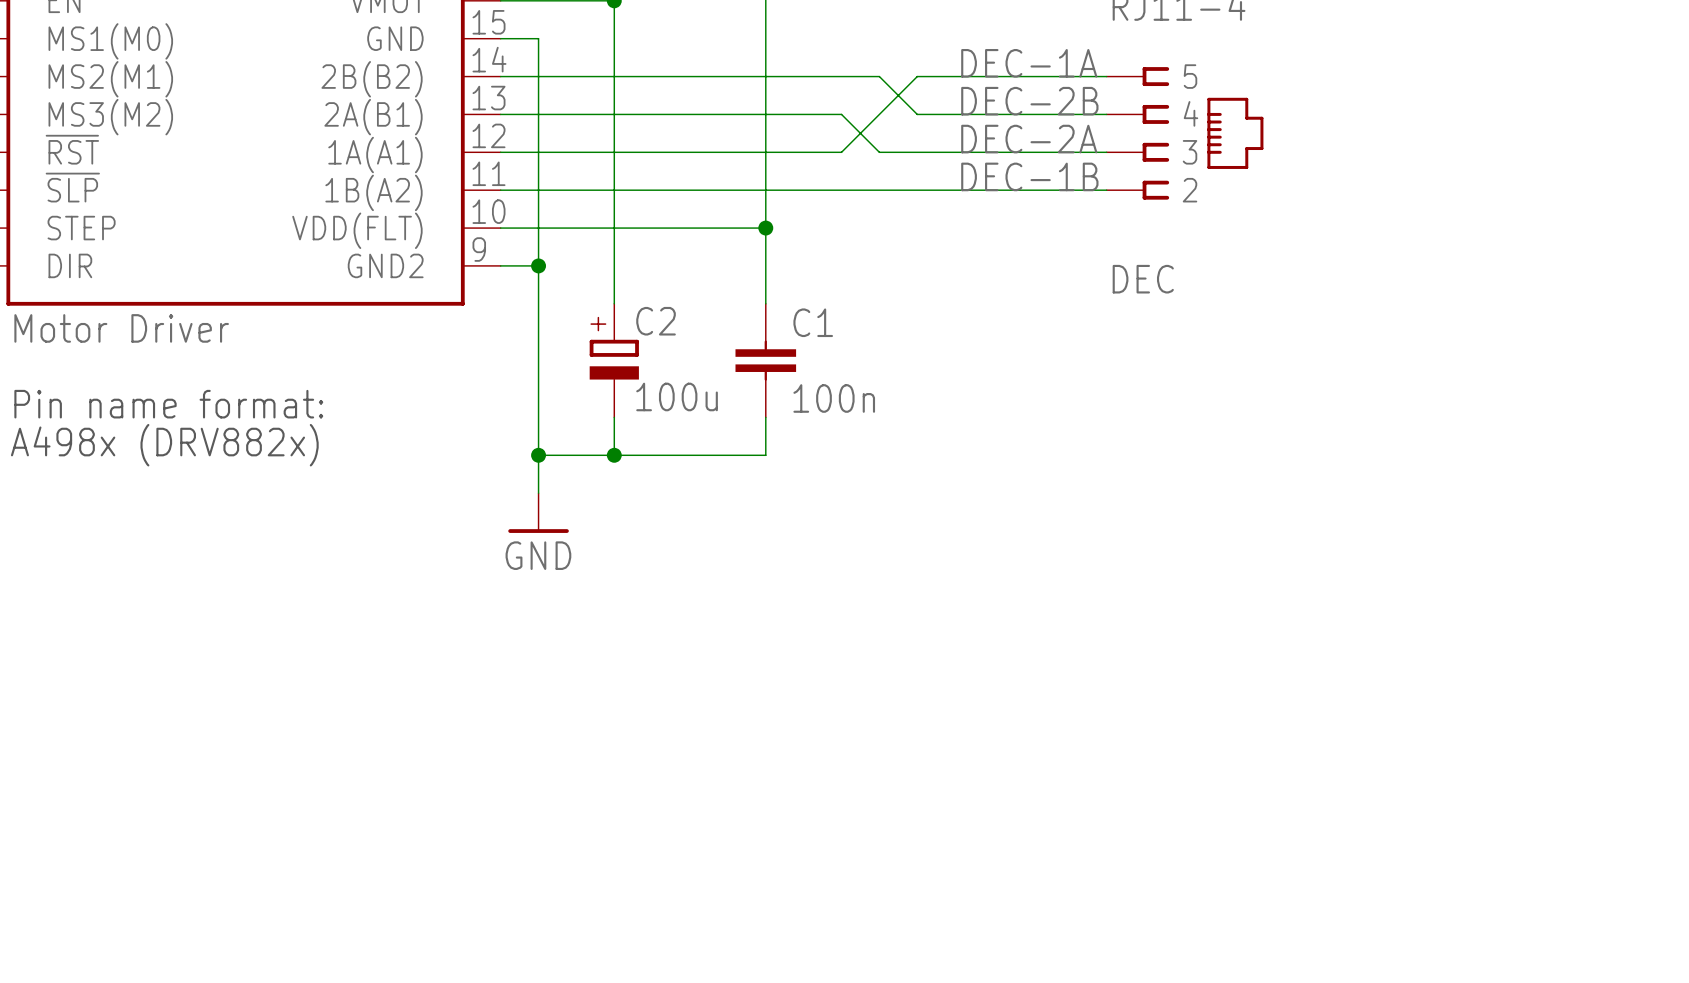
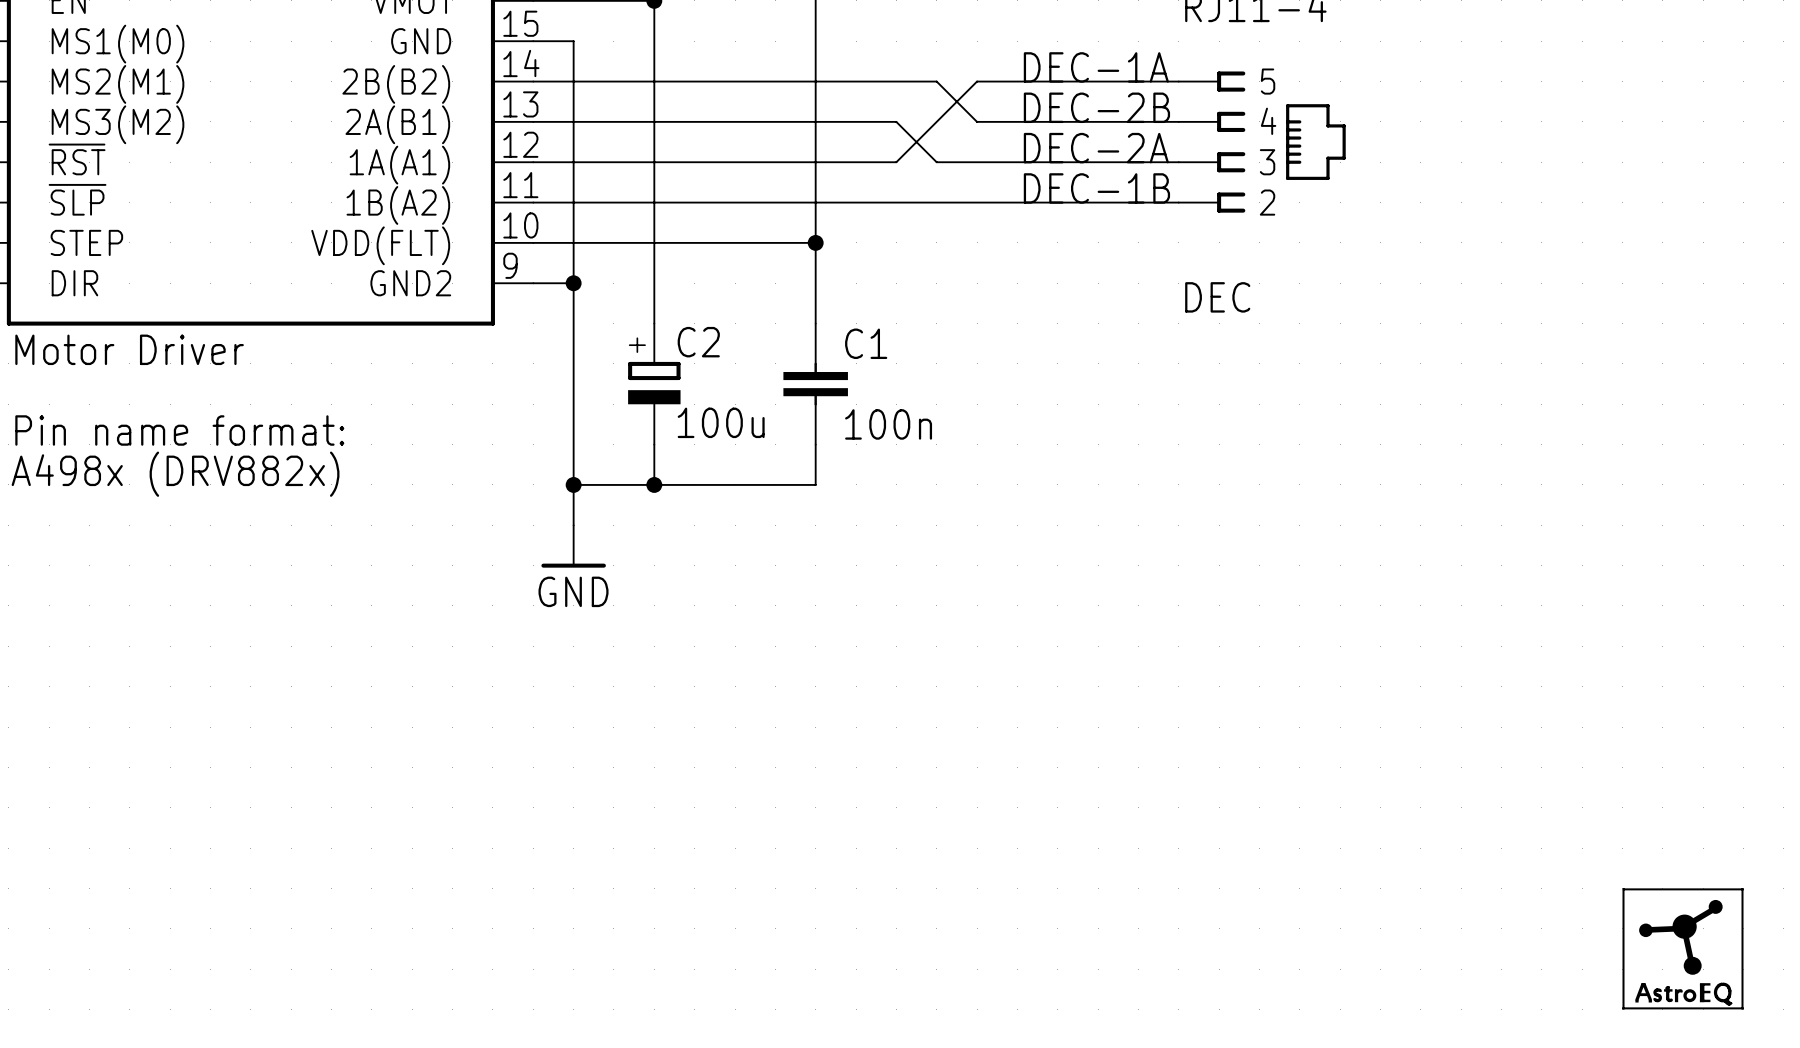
part: none -> (1683, 948)

